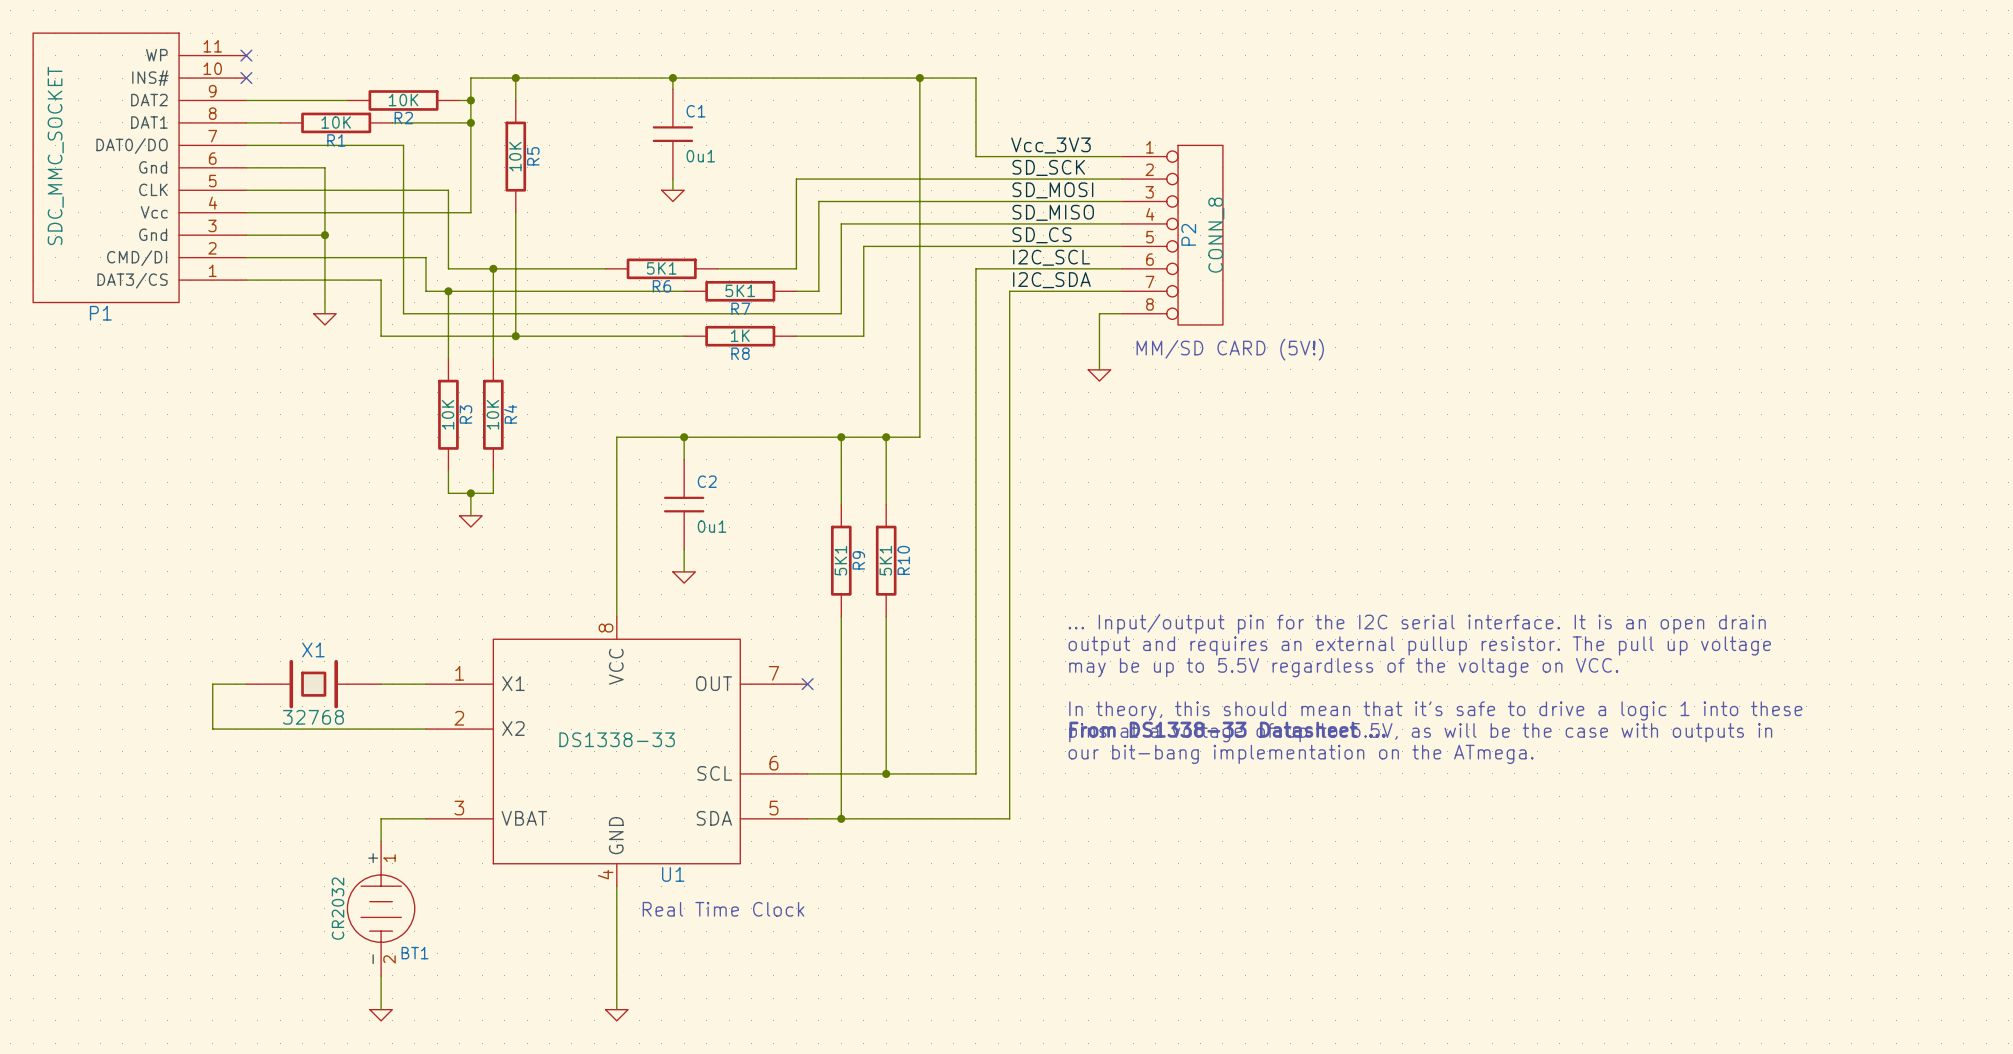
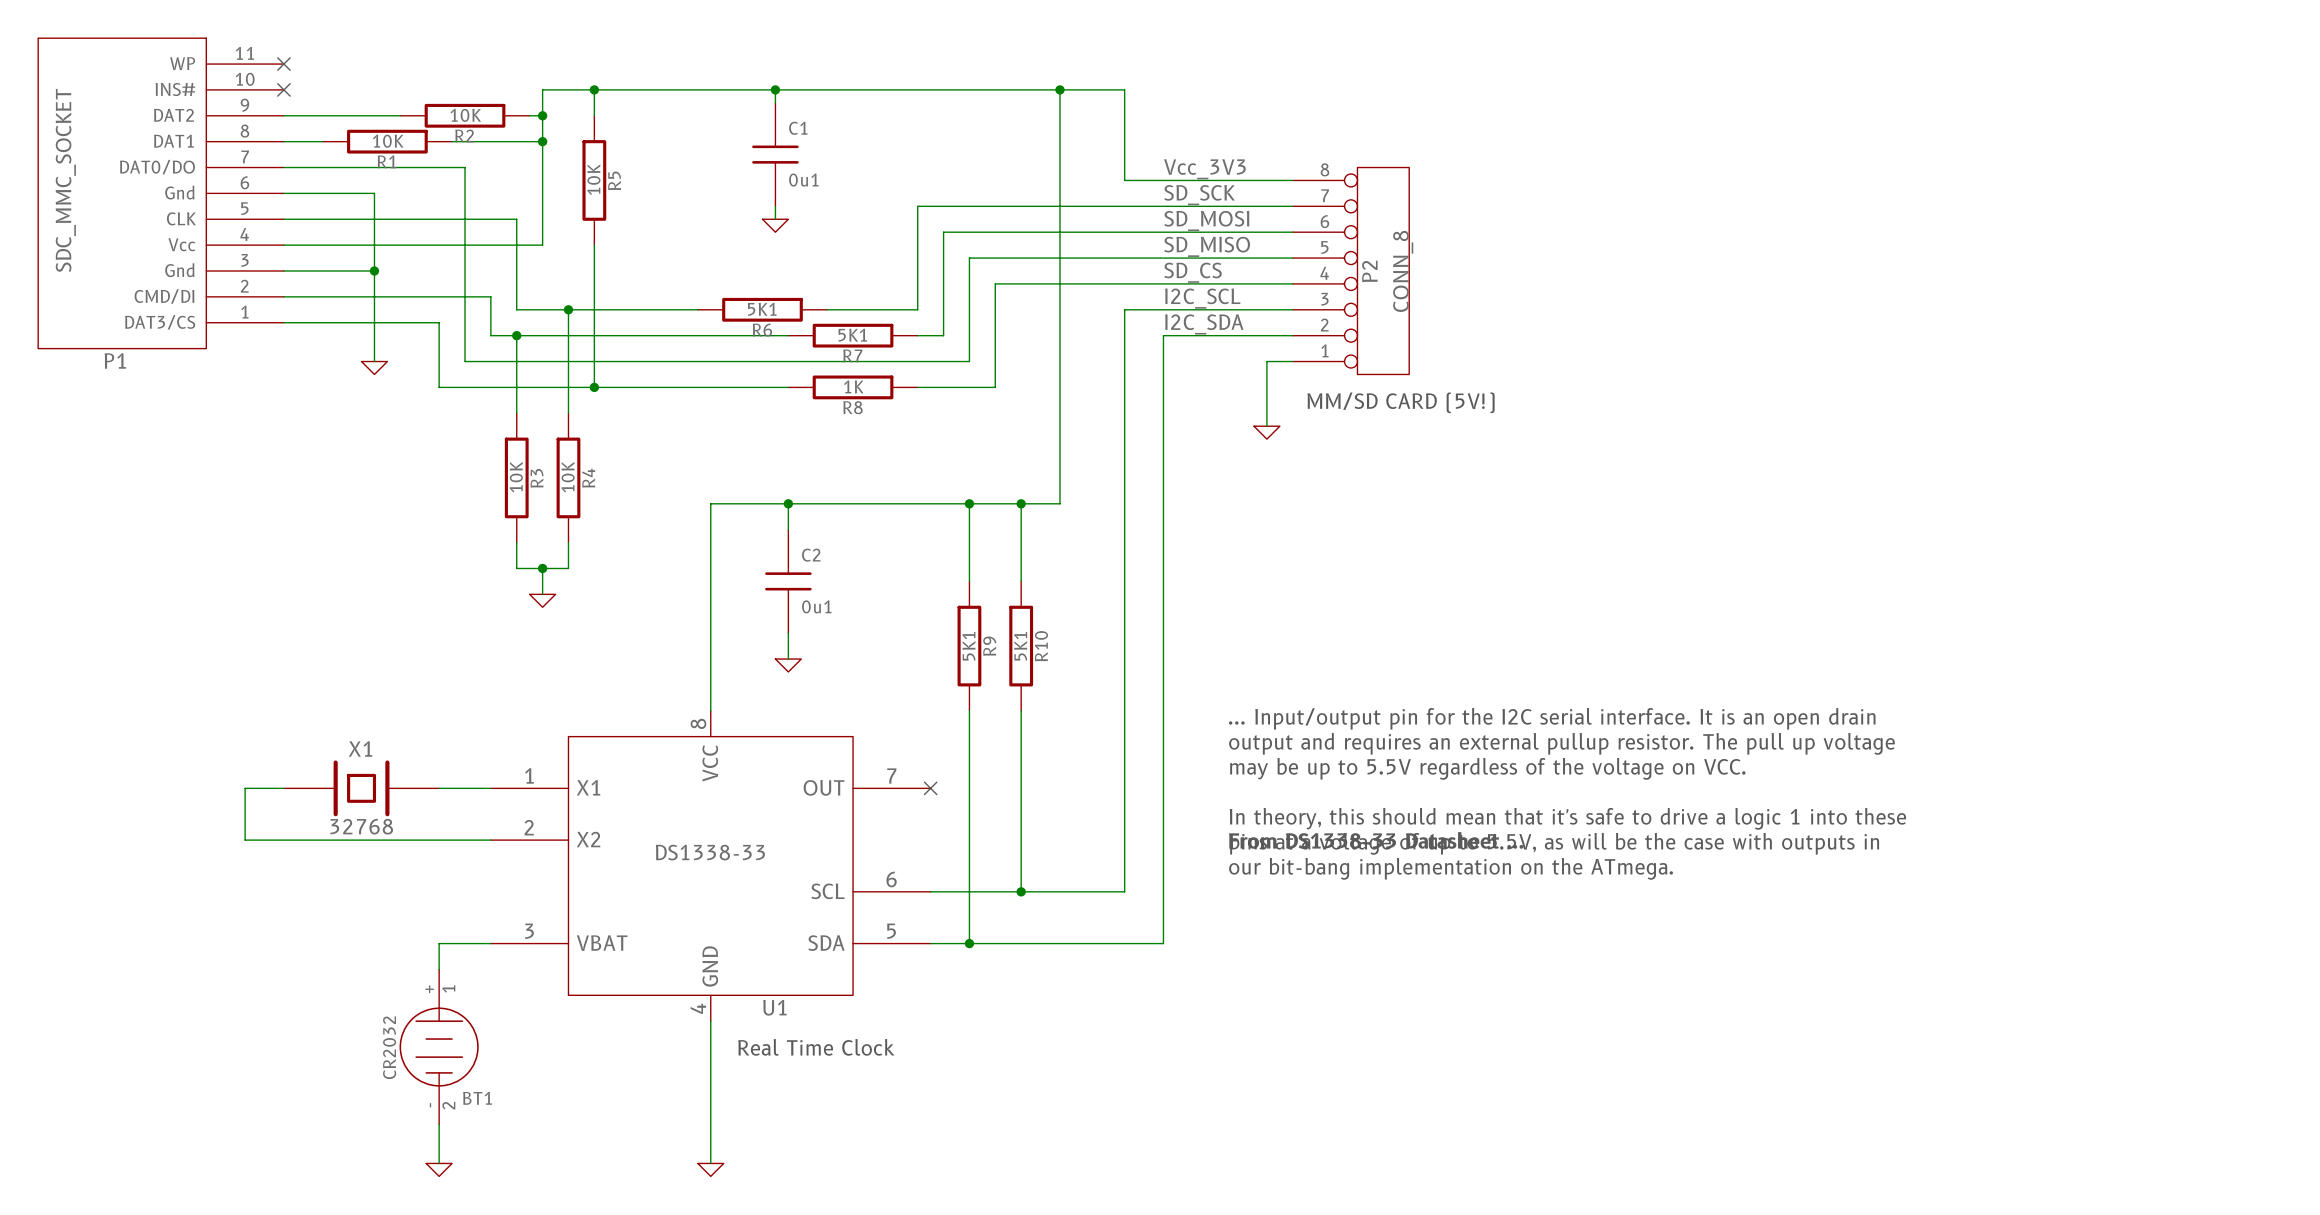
P2 flip: as is (1200, 235) -> up-down (1383, 270)

